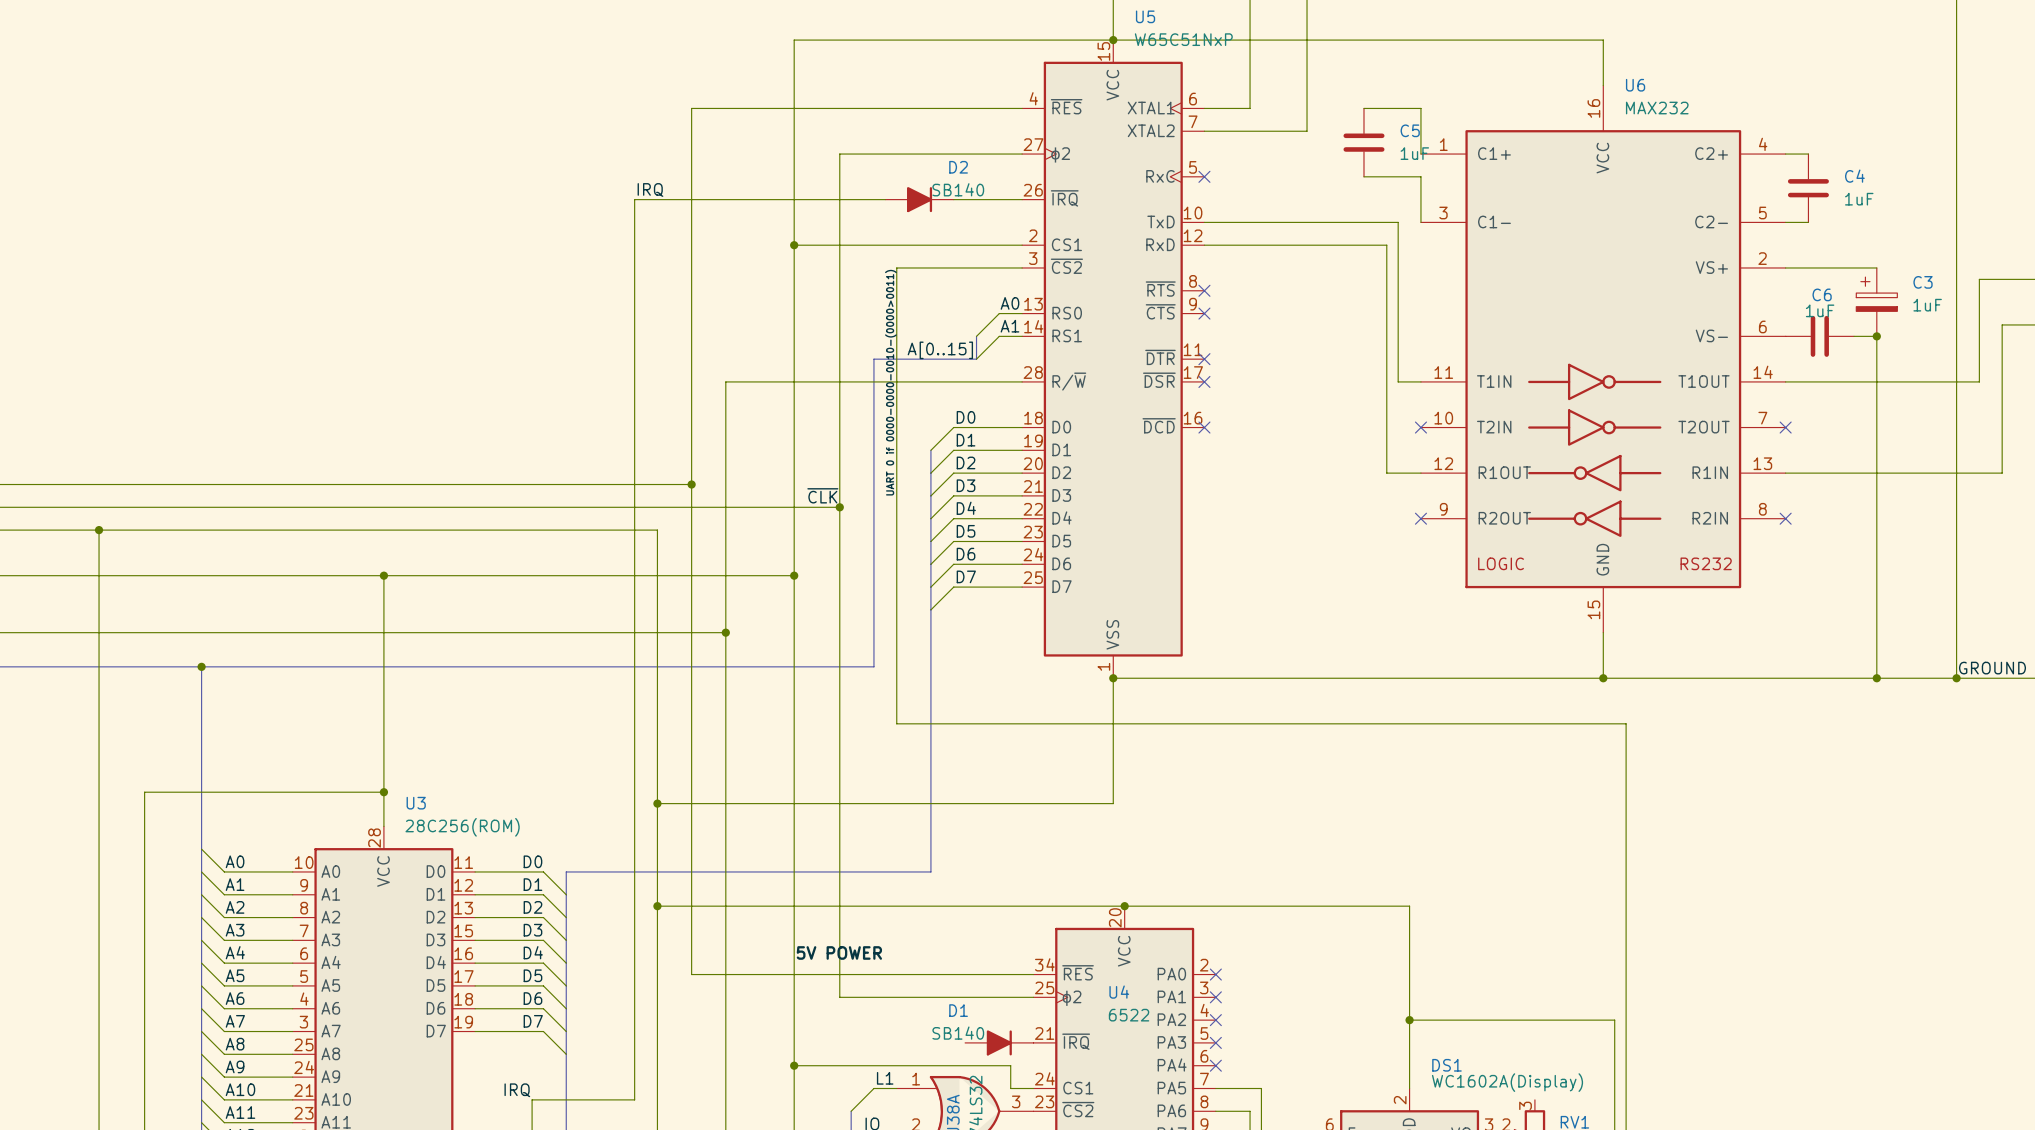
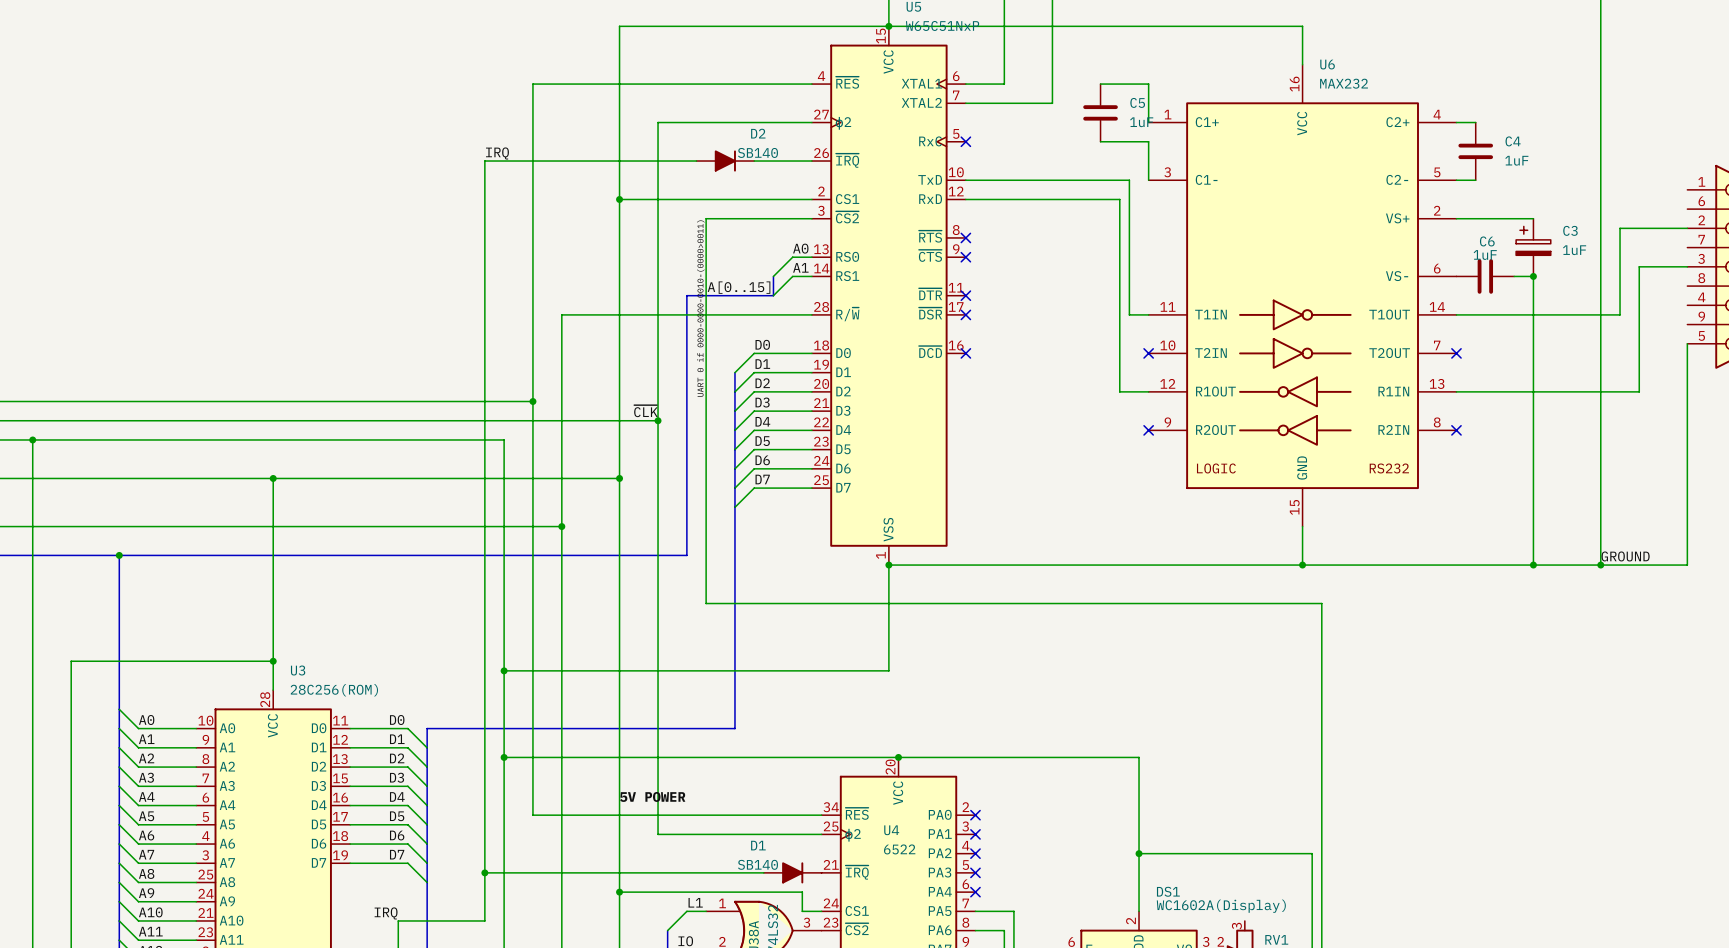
wire: none -> (484, 872) (763, 872)
junction: none -> (484, 872)

